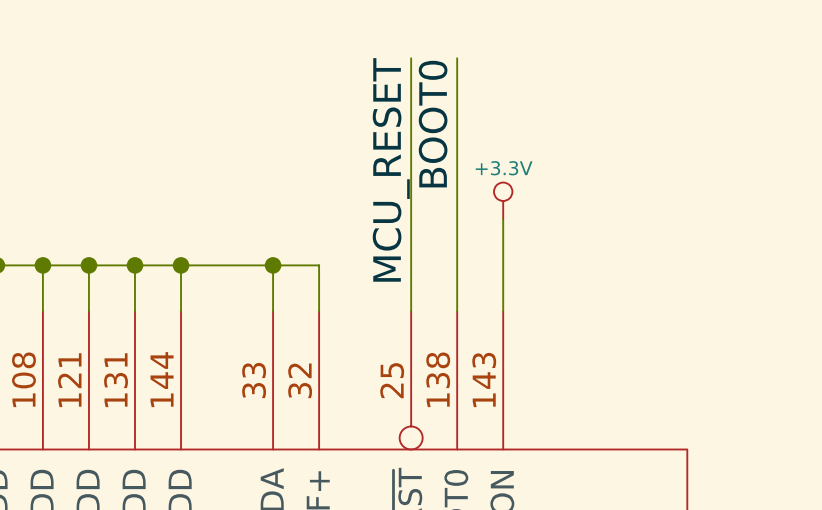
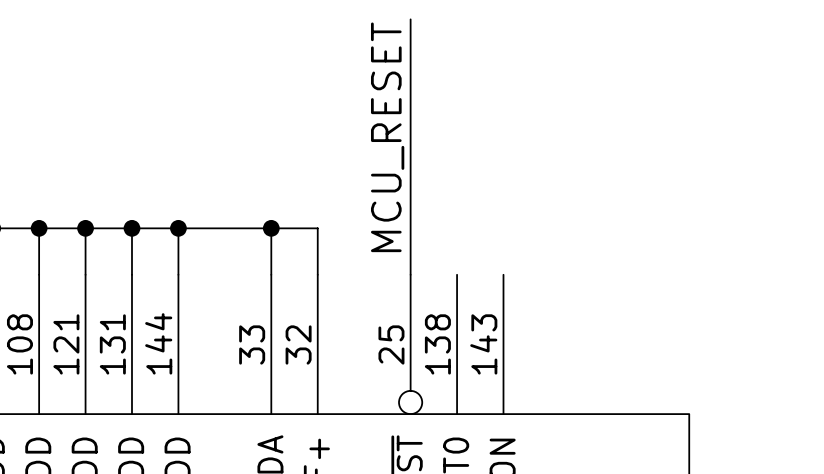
wire: (457, 58) (457, 311) -> none
label: BOOT0 (433, 124) -> none
power symbol: +3.3V (503, 200) -> none
wire: (503, 219) (503, 311) -> none

